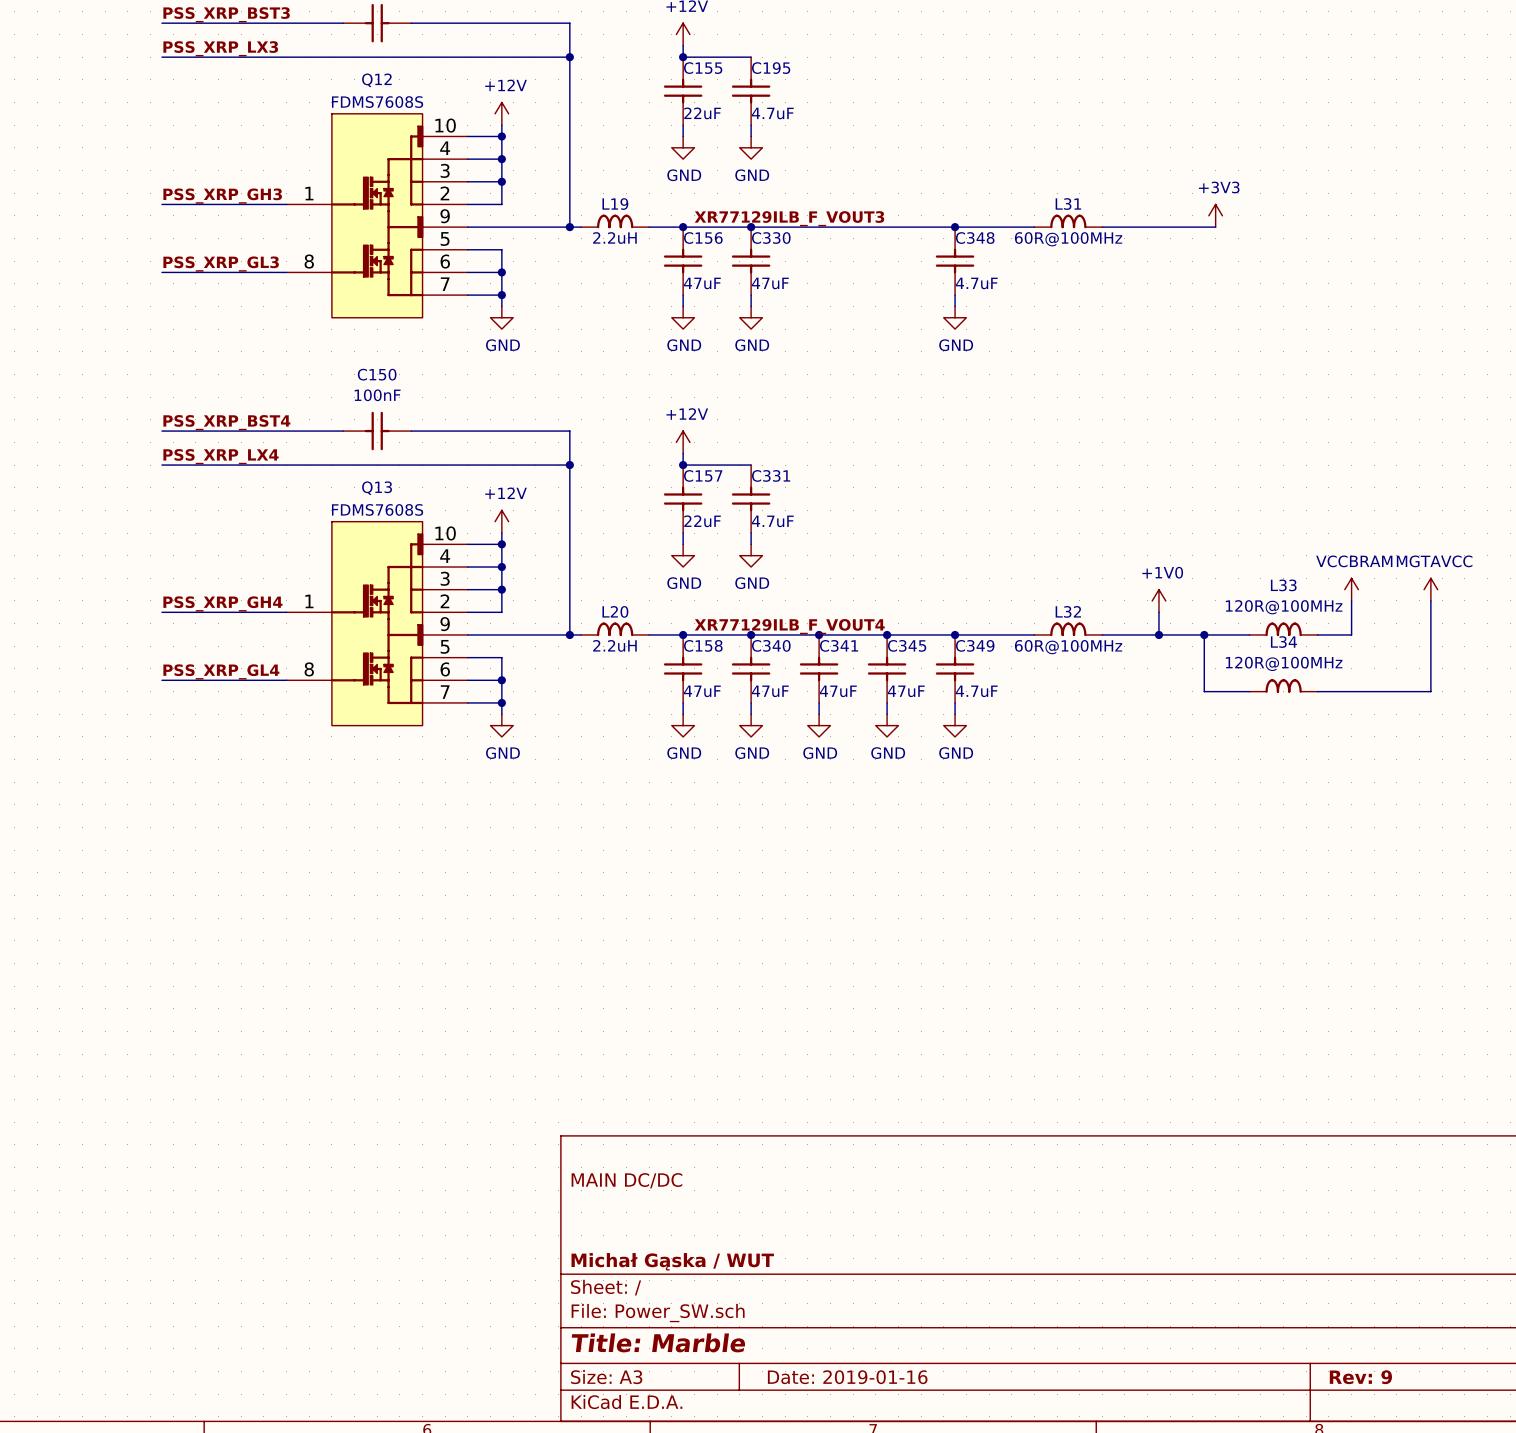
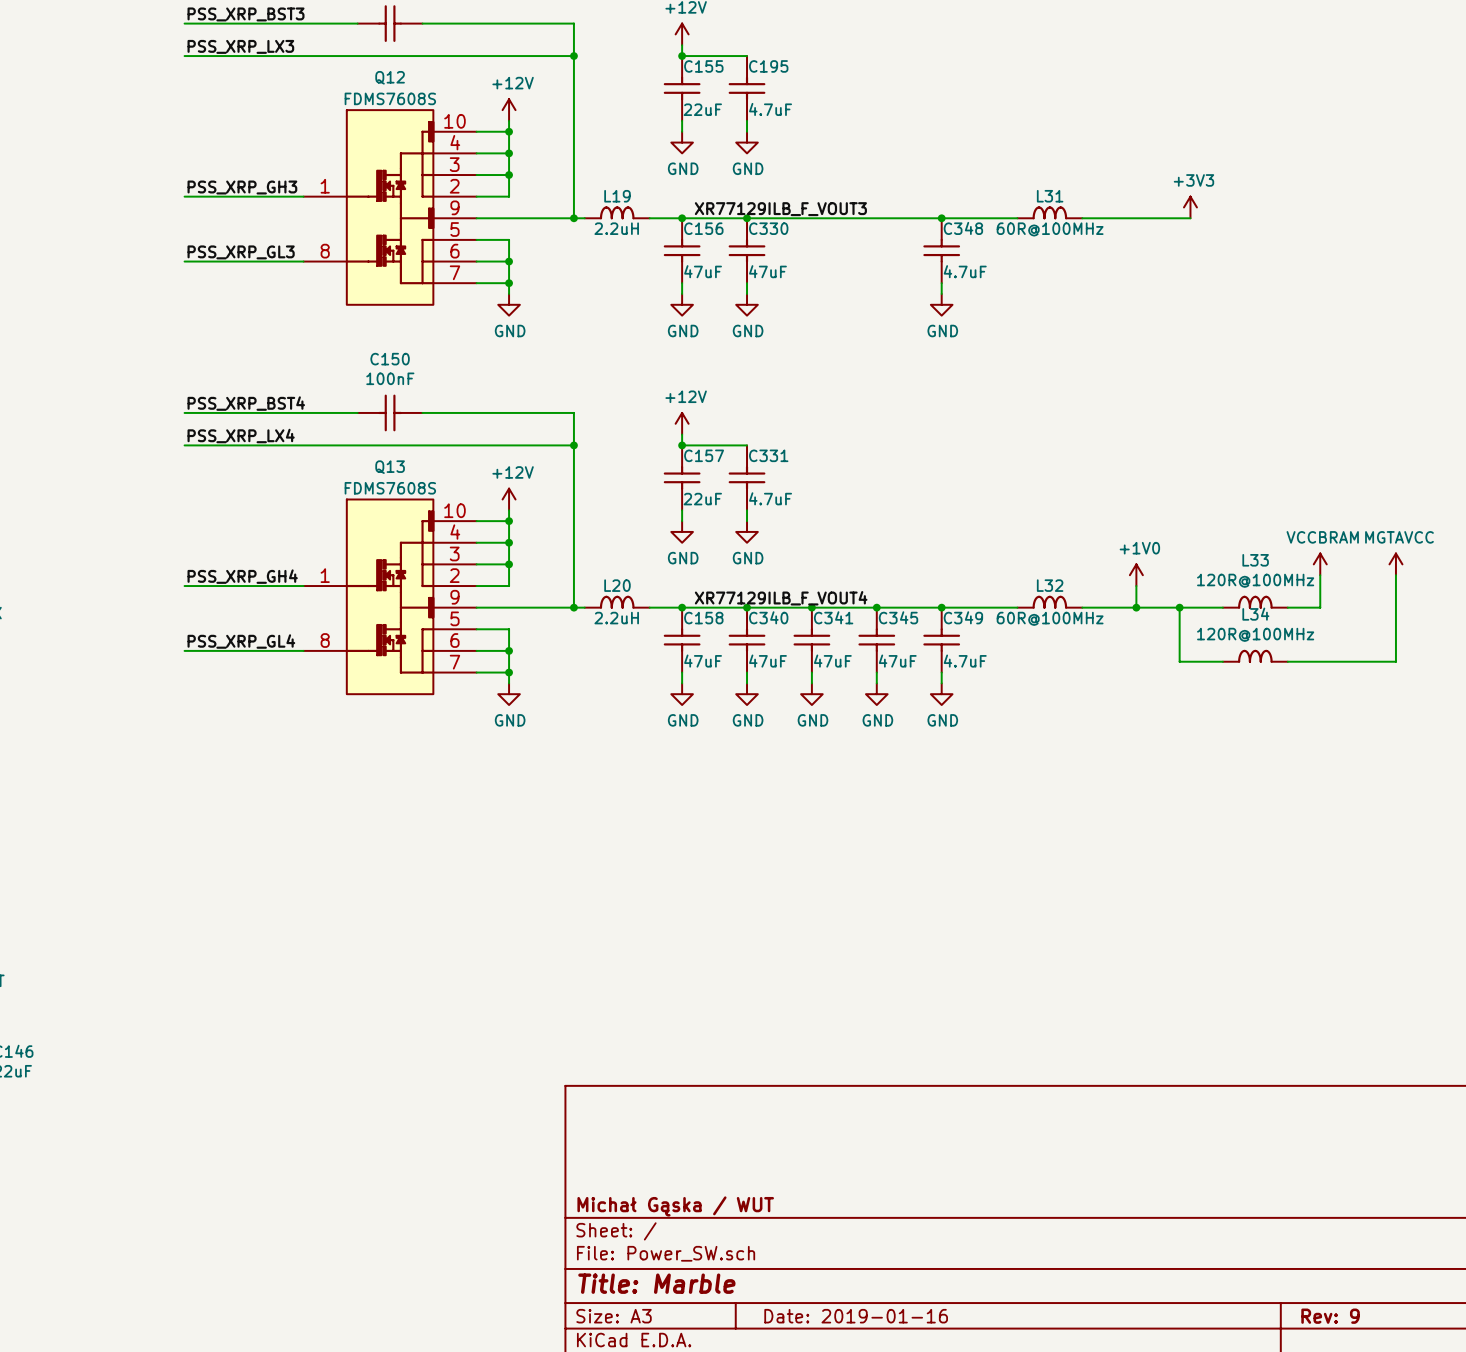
title block: MAIN DC/DC (626, 1180) -> none

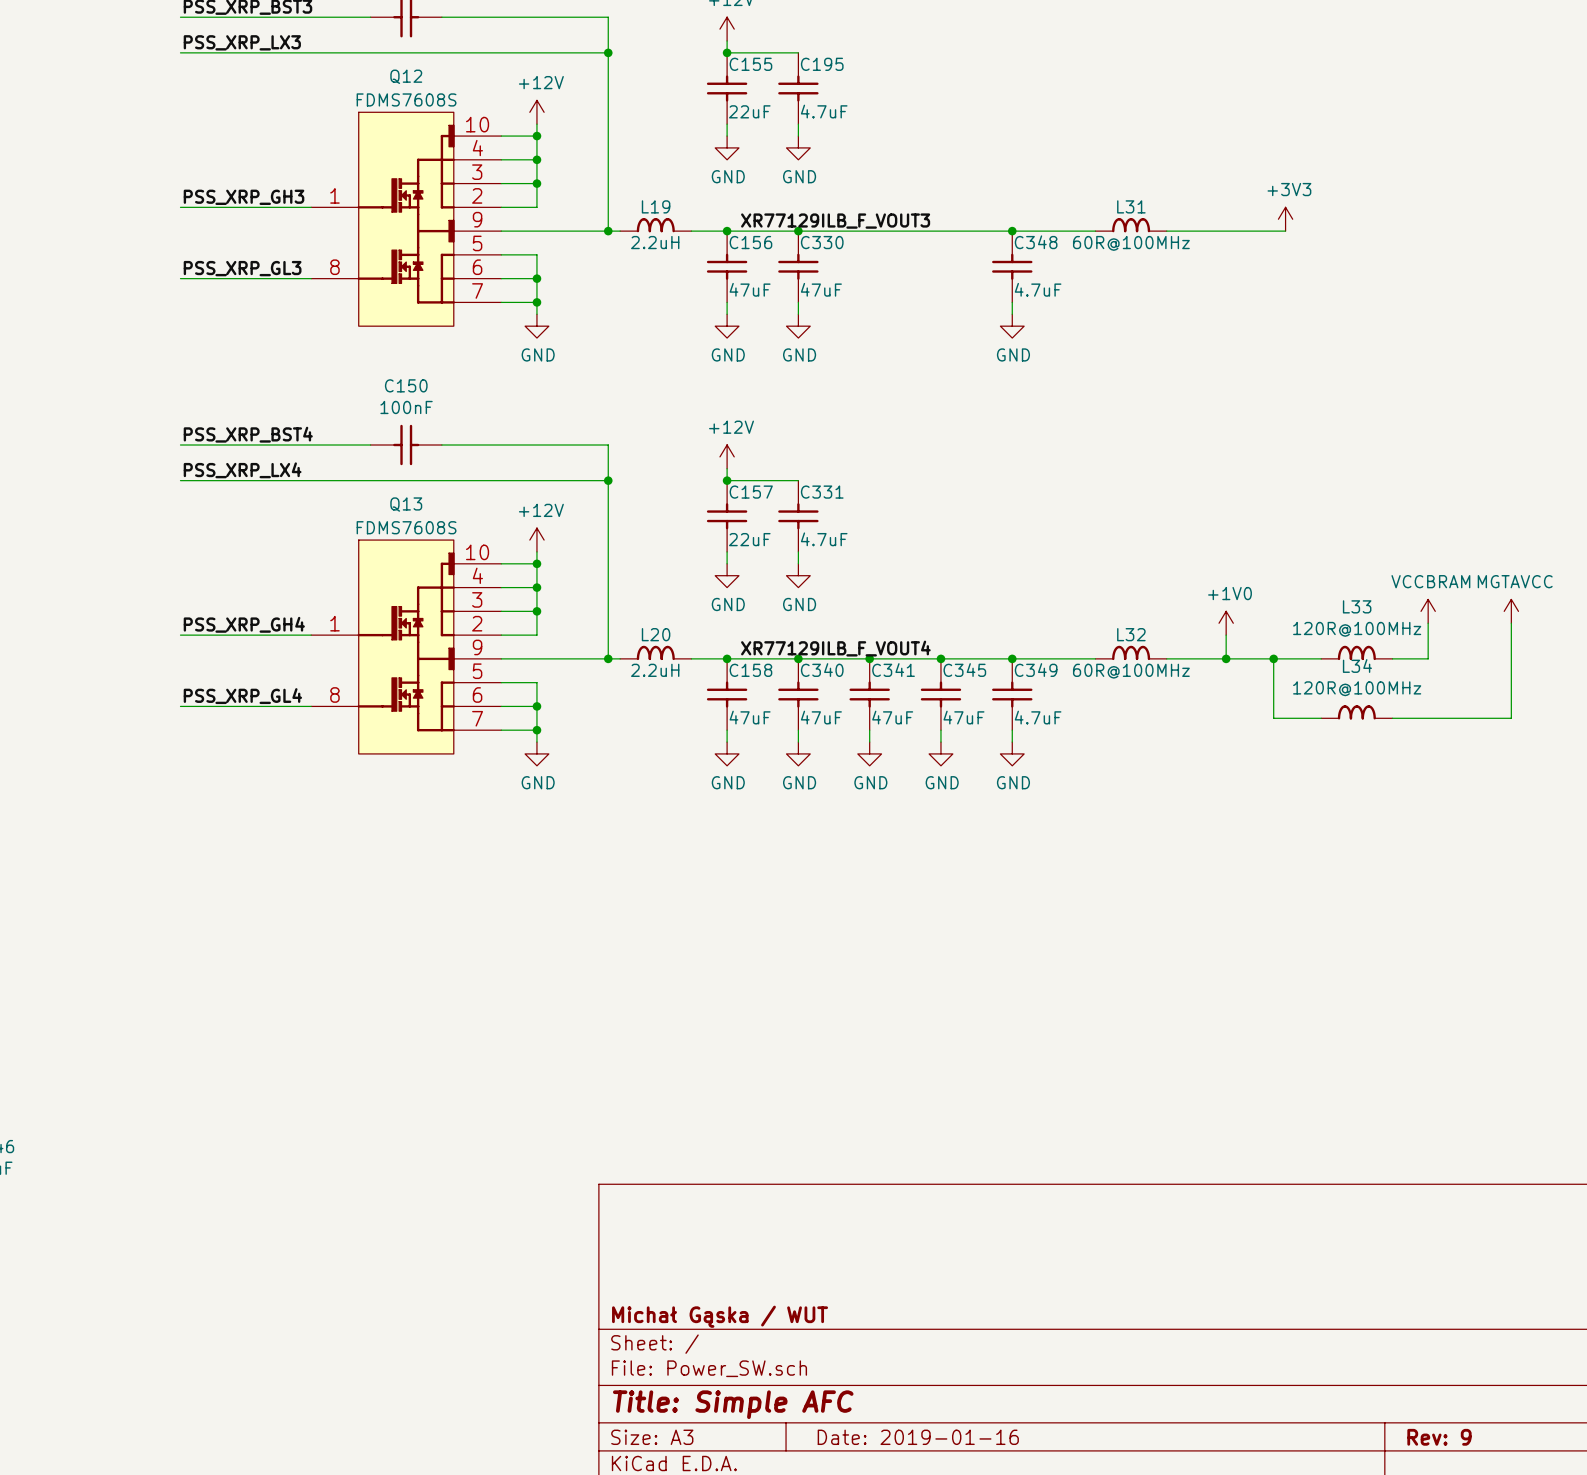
title block: Title: Marble (656, 1283) -> Title: Simple AFC (733, 1404)

